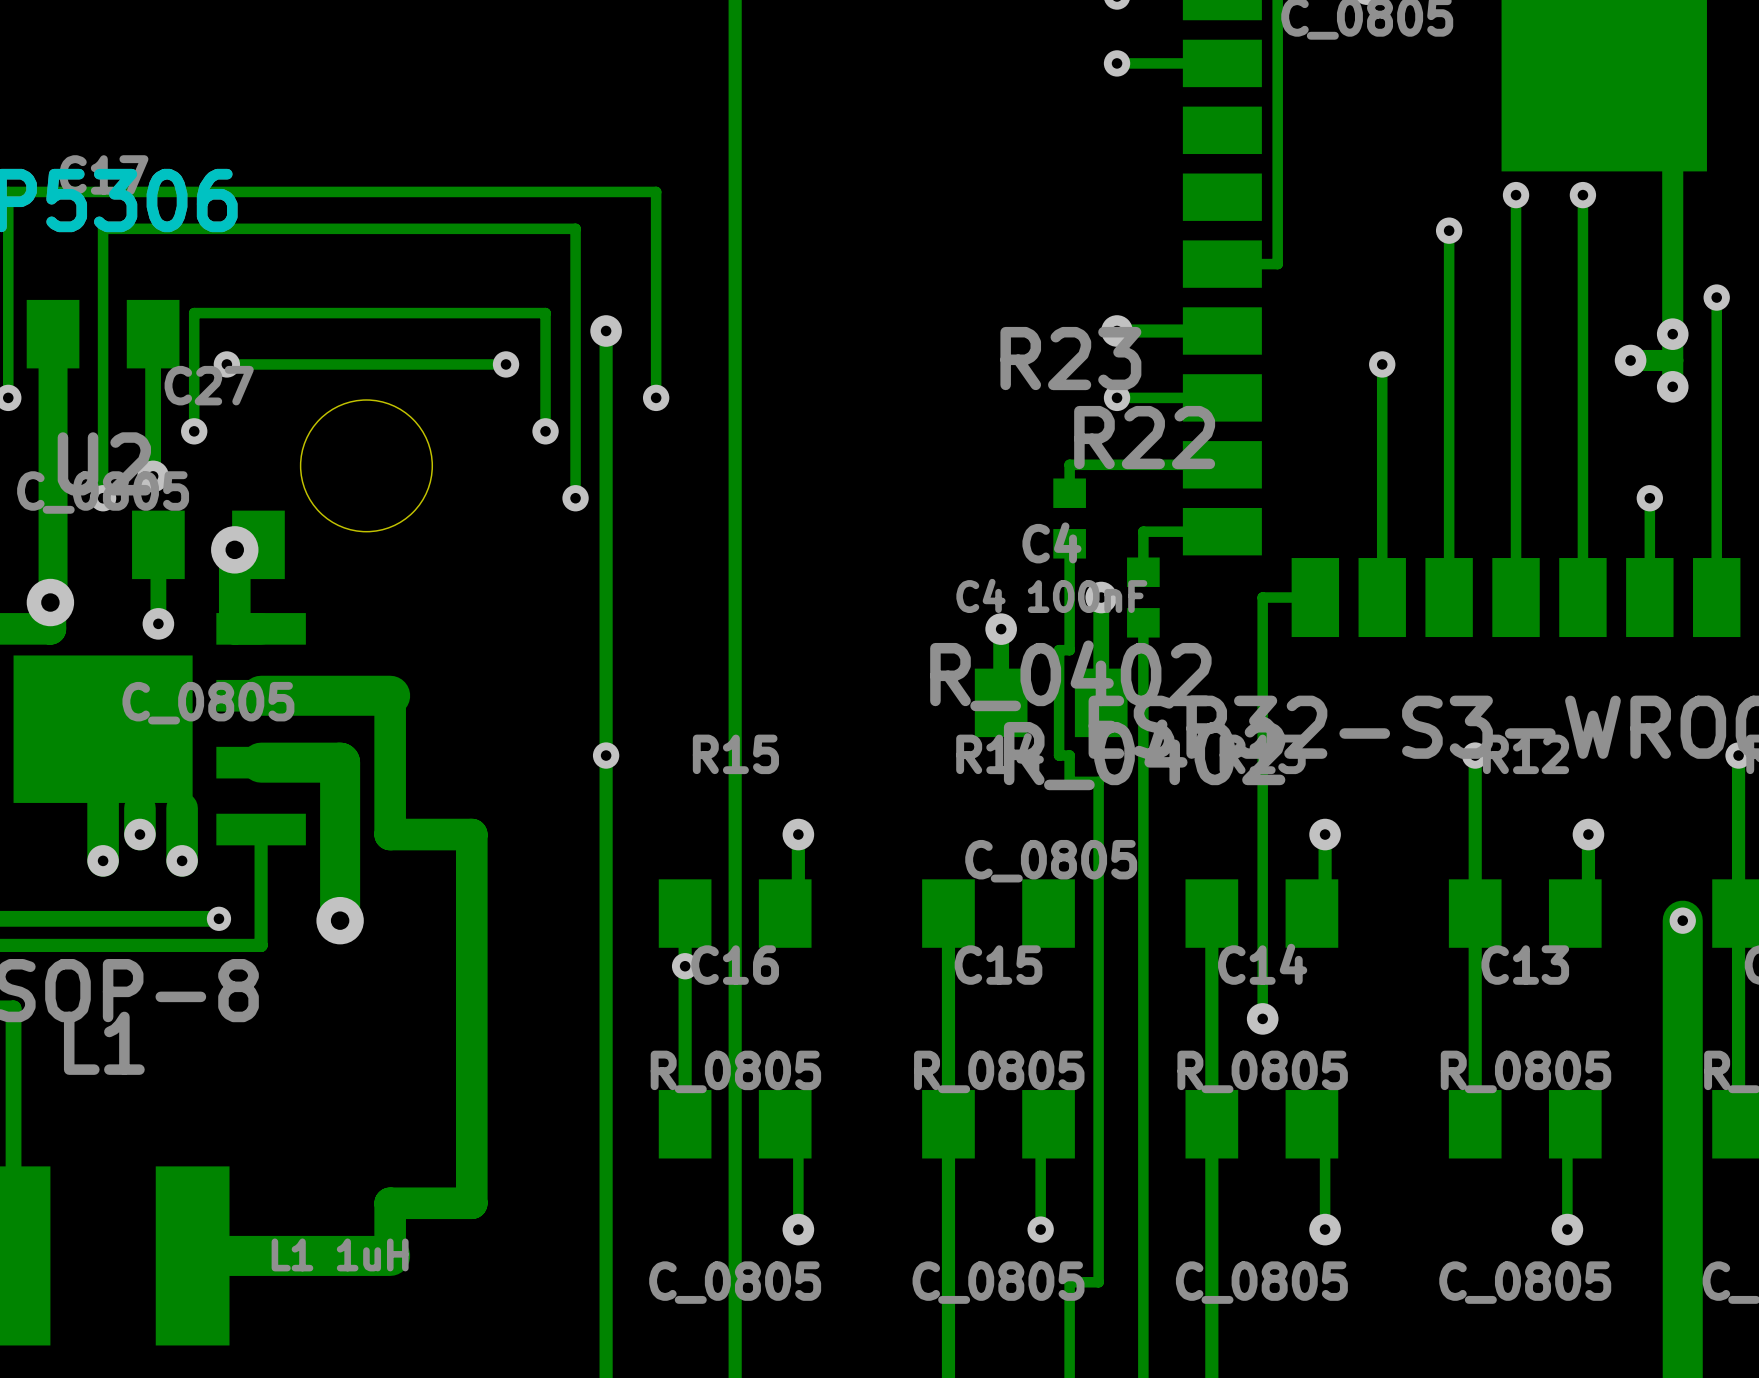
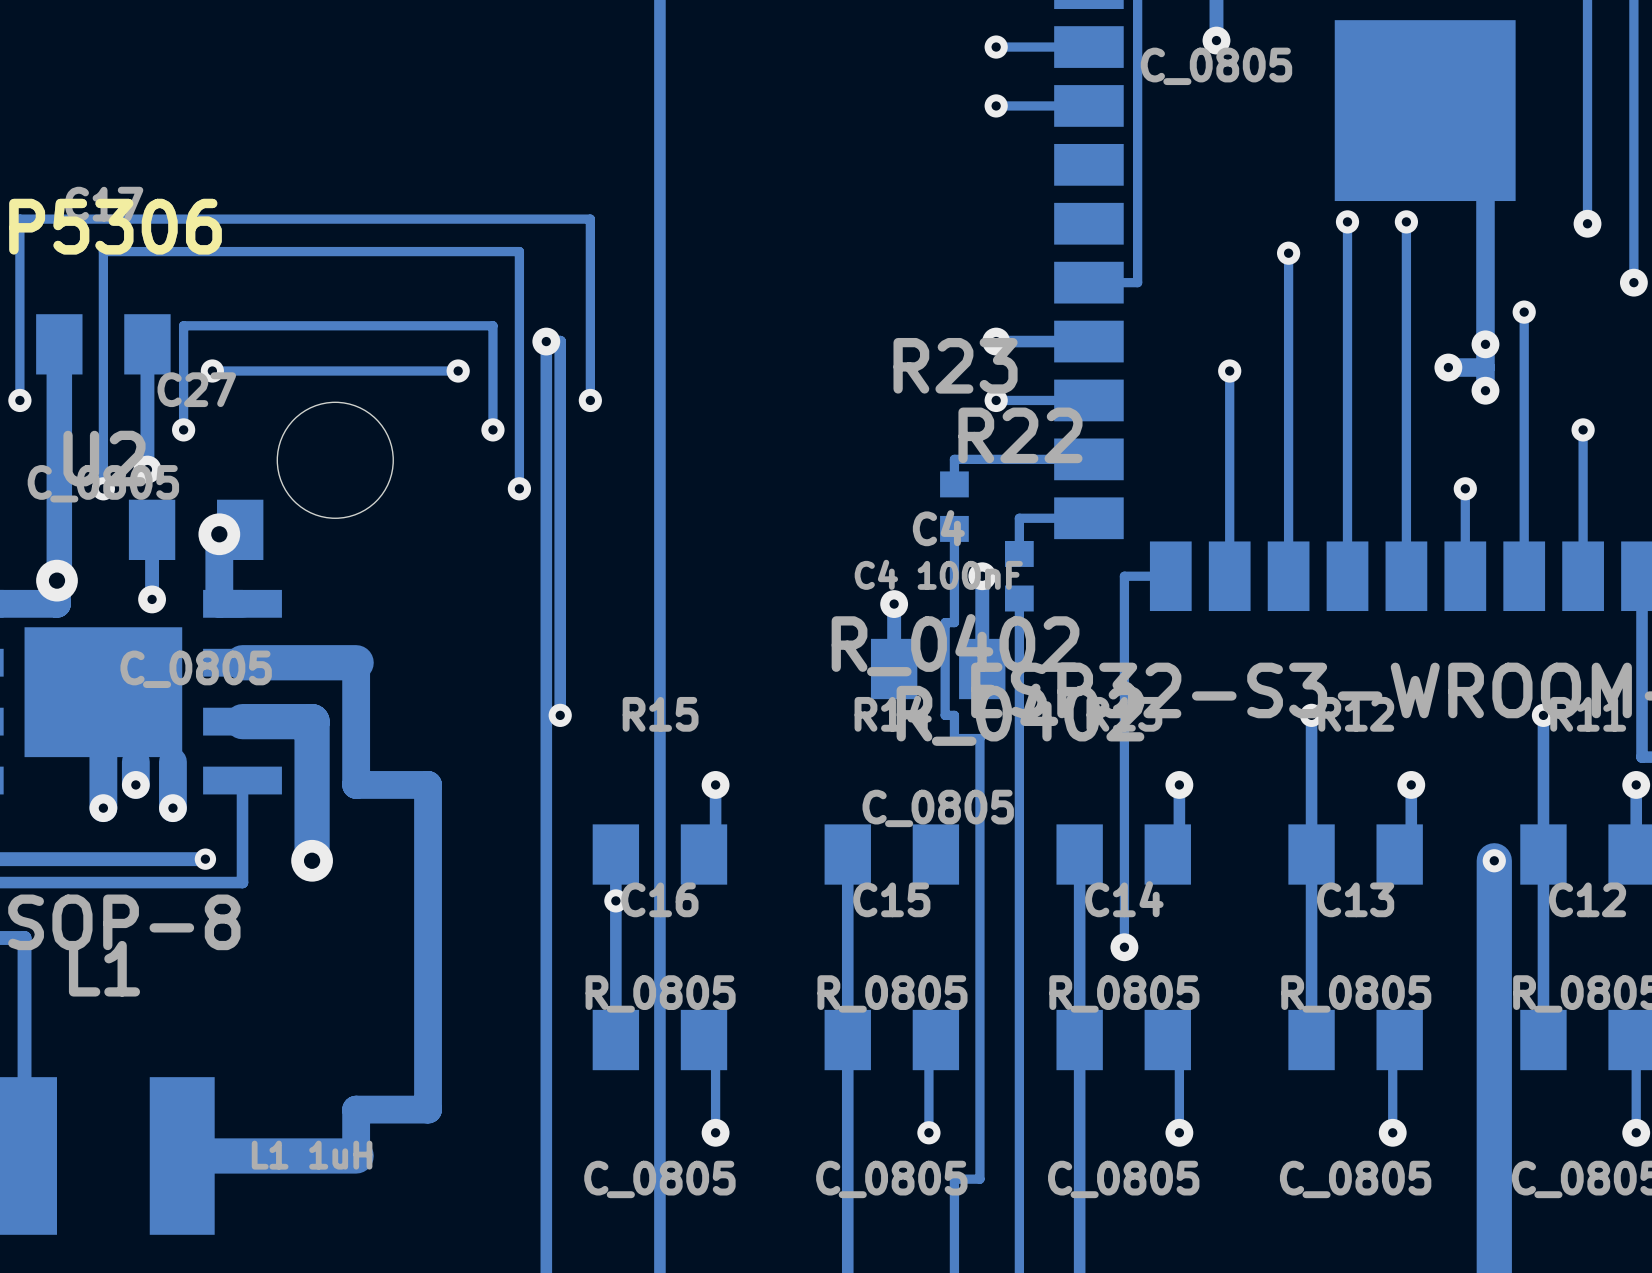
track: none -> (546, 341) (560, 341) (560, 715)
via position: (606, 755) -> (560, 715)

